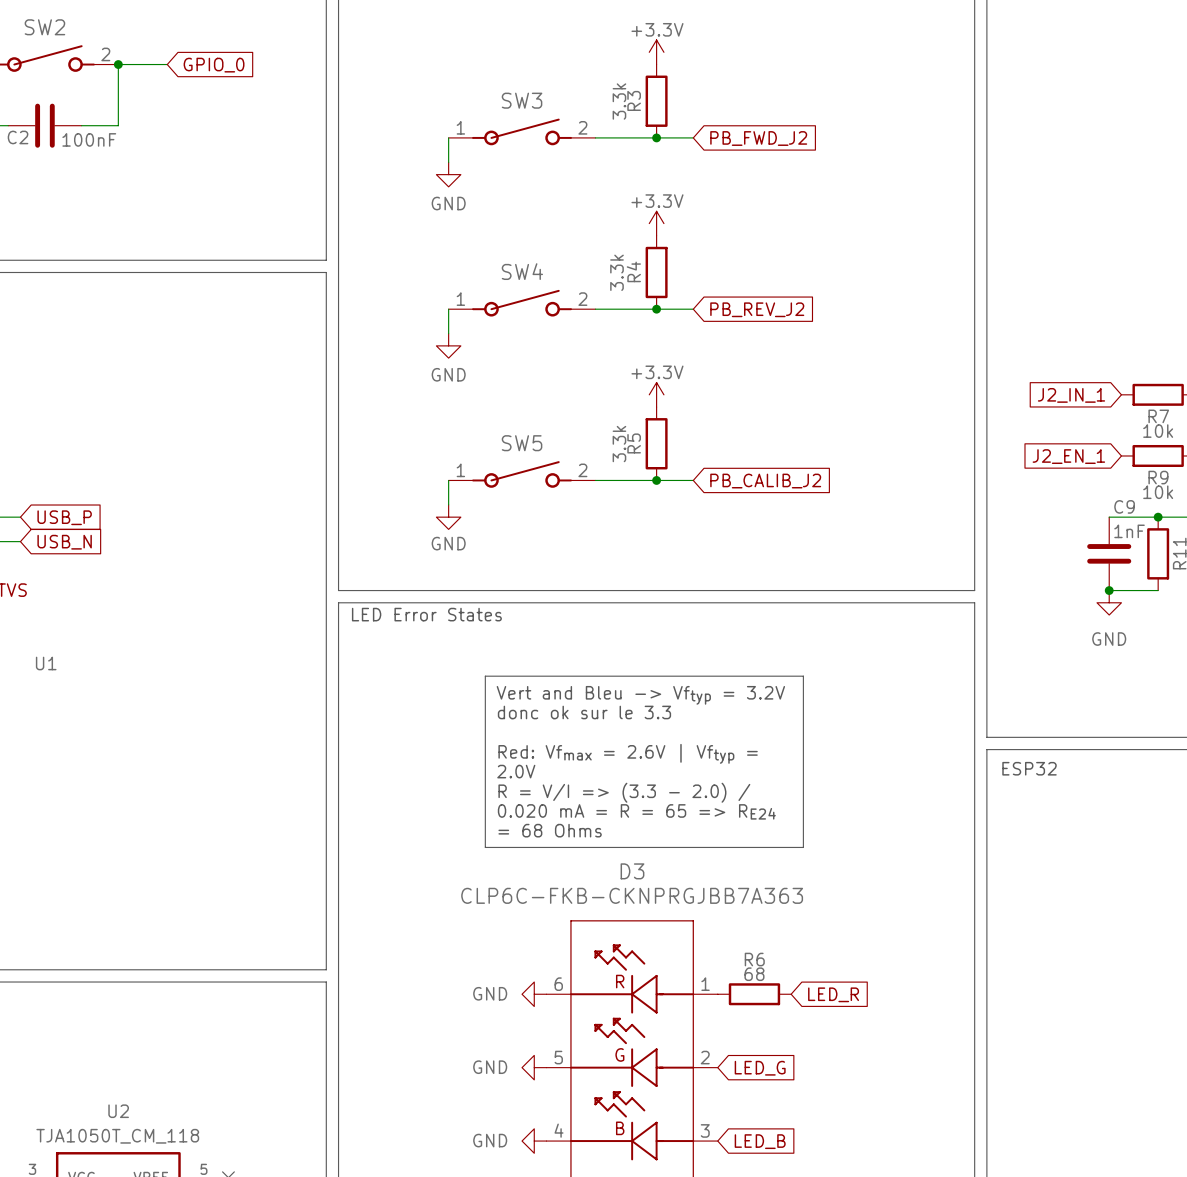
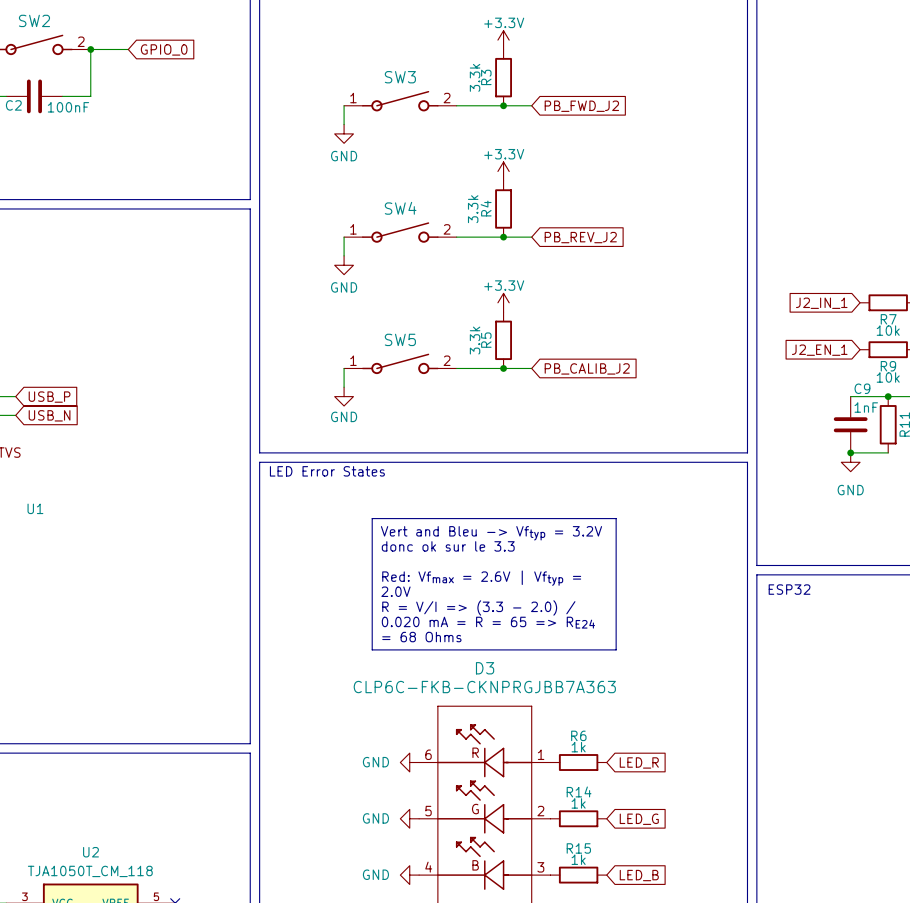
R6 value: 68 (754, 974) -> 1k (578, 747)
R14: none -> 1k (578, 818)
global label position: LED_G (760, 1068) -> LED_G (639, 819)
R15: none -> 1k (578, 875)
global label position: LED_B (760, 1141) -> LED_B (639, 875)

